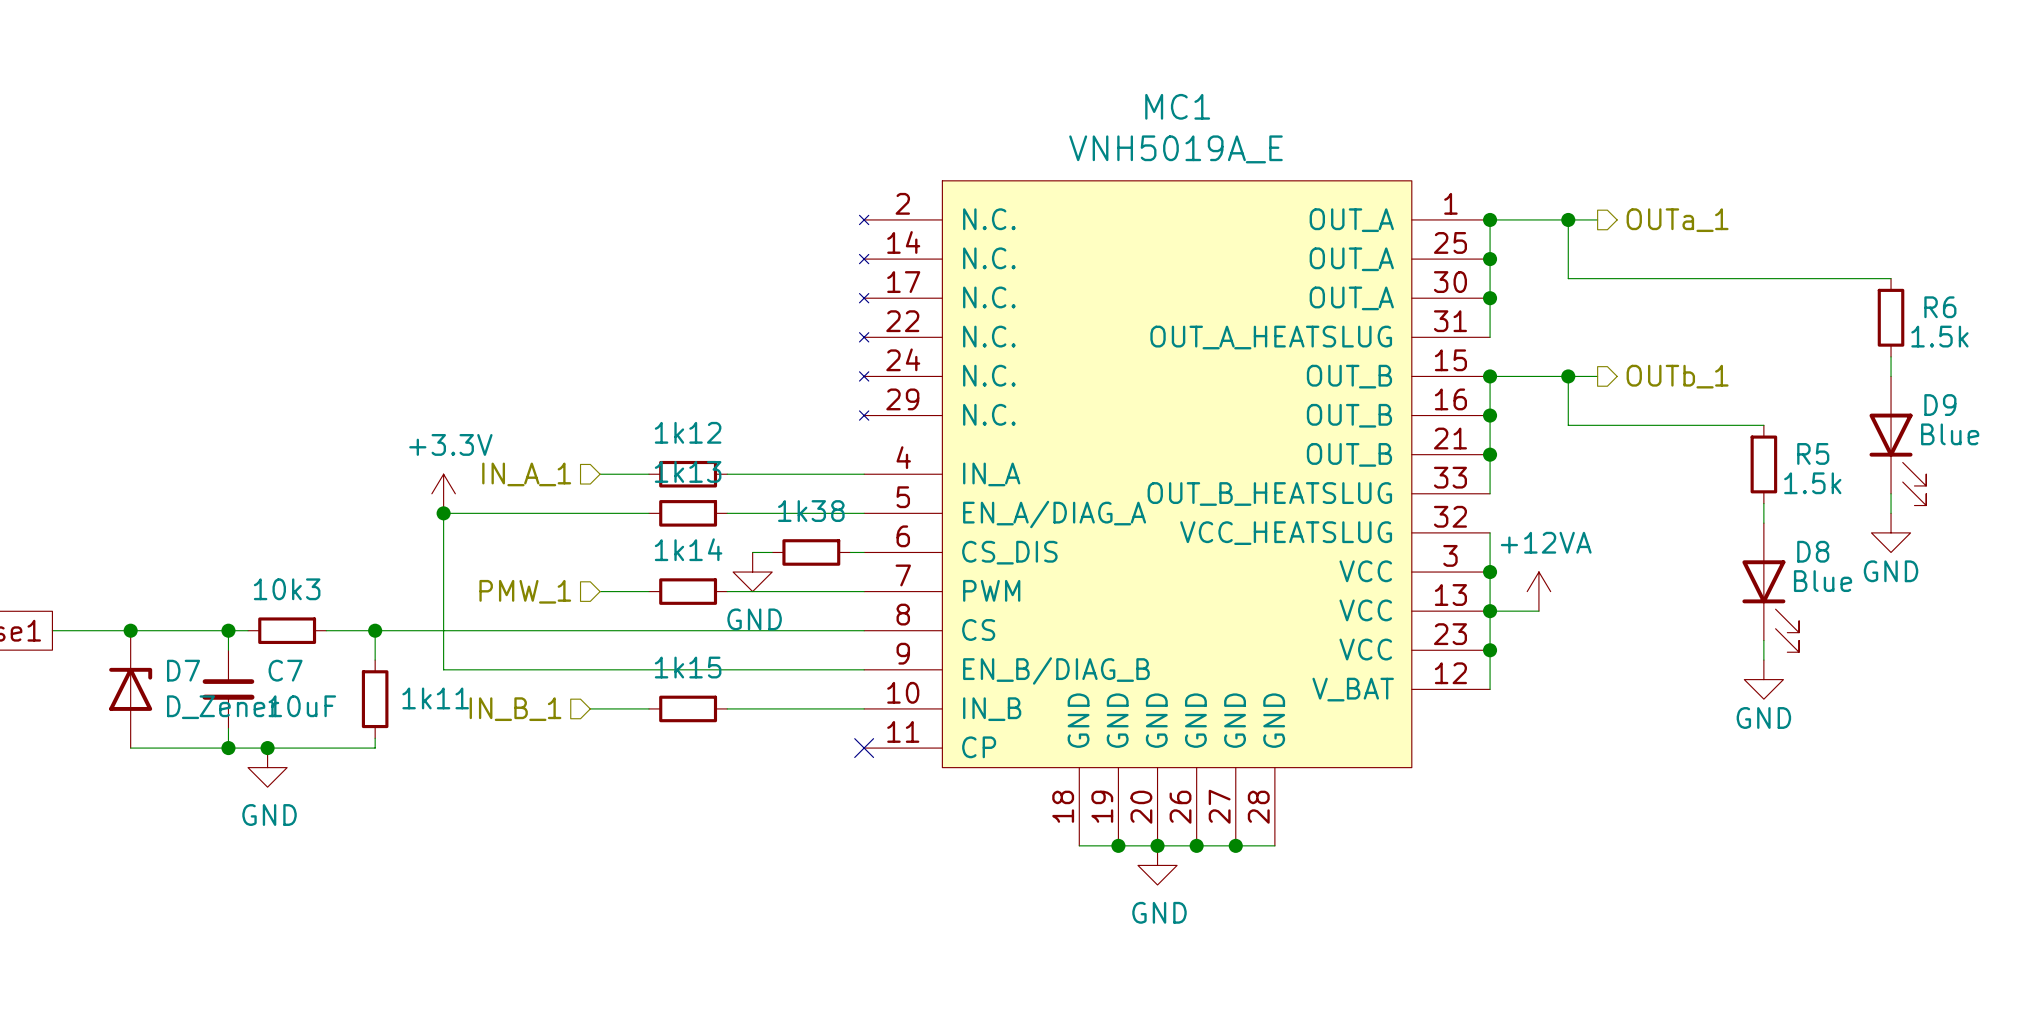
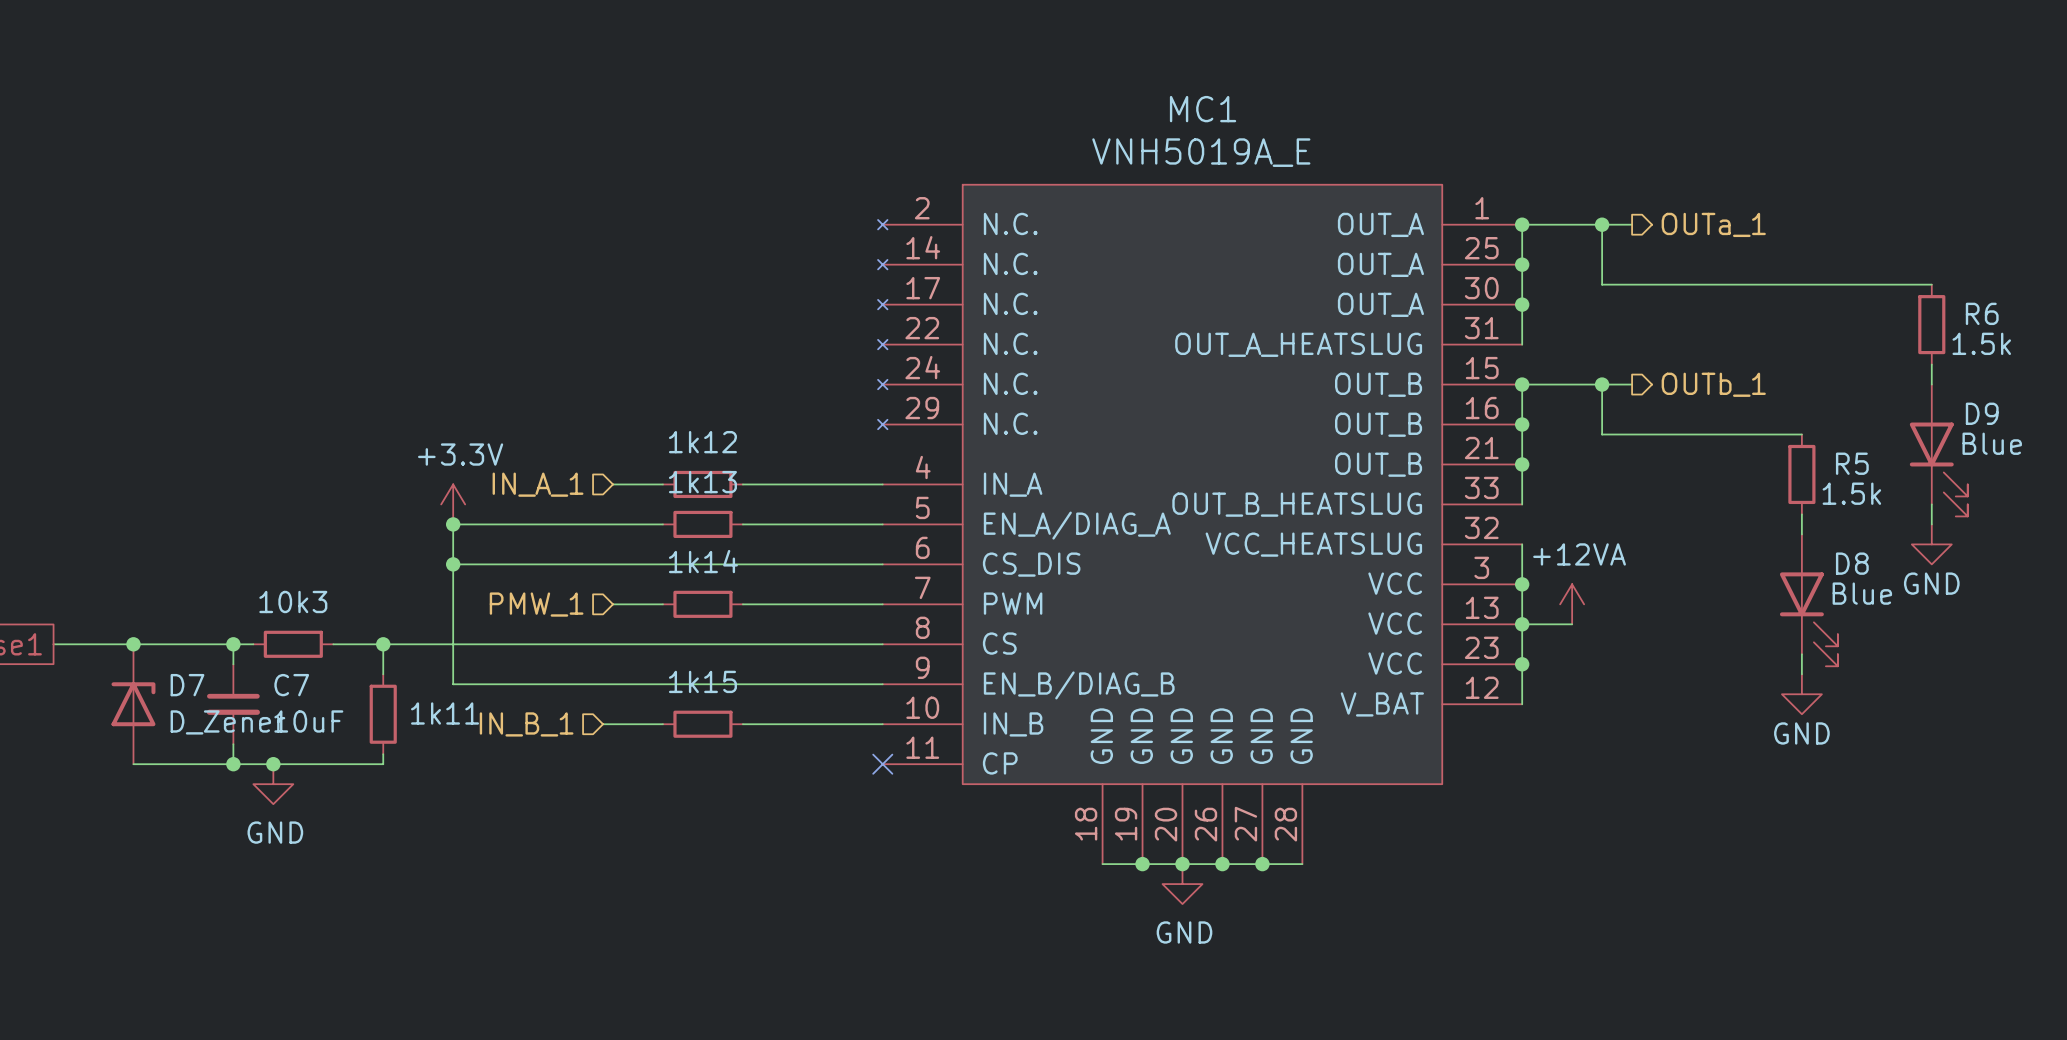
wire: none -> (453, 564) (768, 564)
junction: none -> (453, 564)
wire: none -> (788, 564) (868, 564)
1k38: (811, 552) -> none
power symbol: GND (752, 572) -> none

